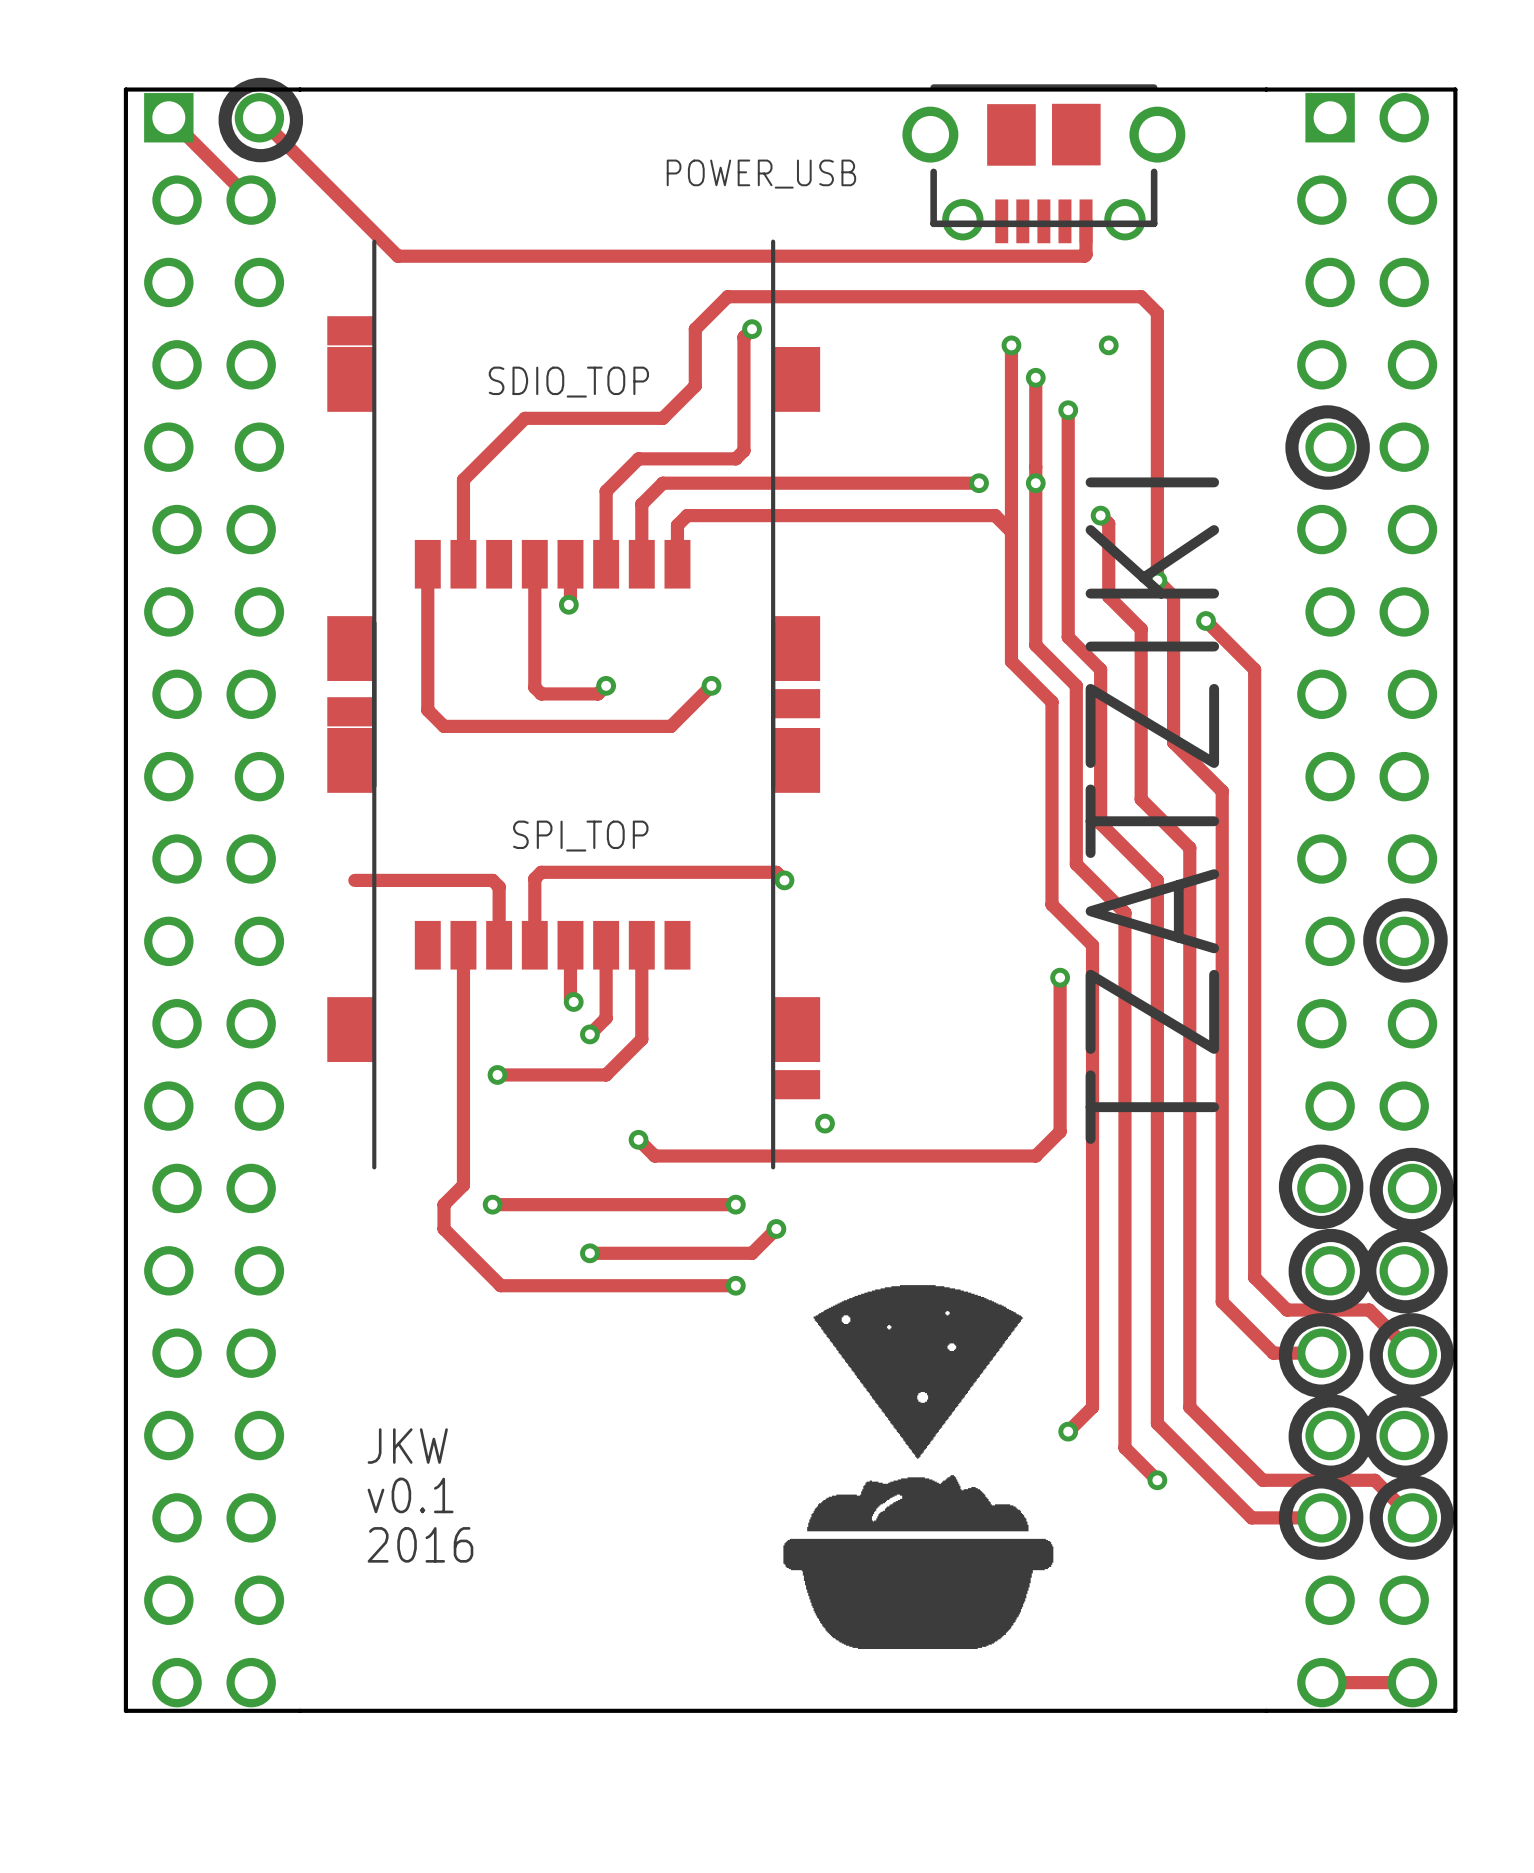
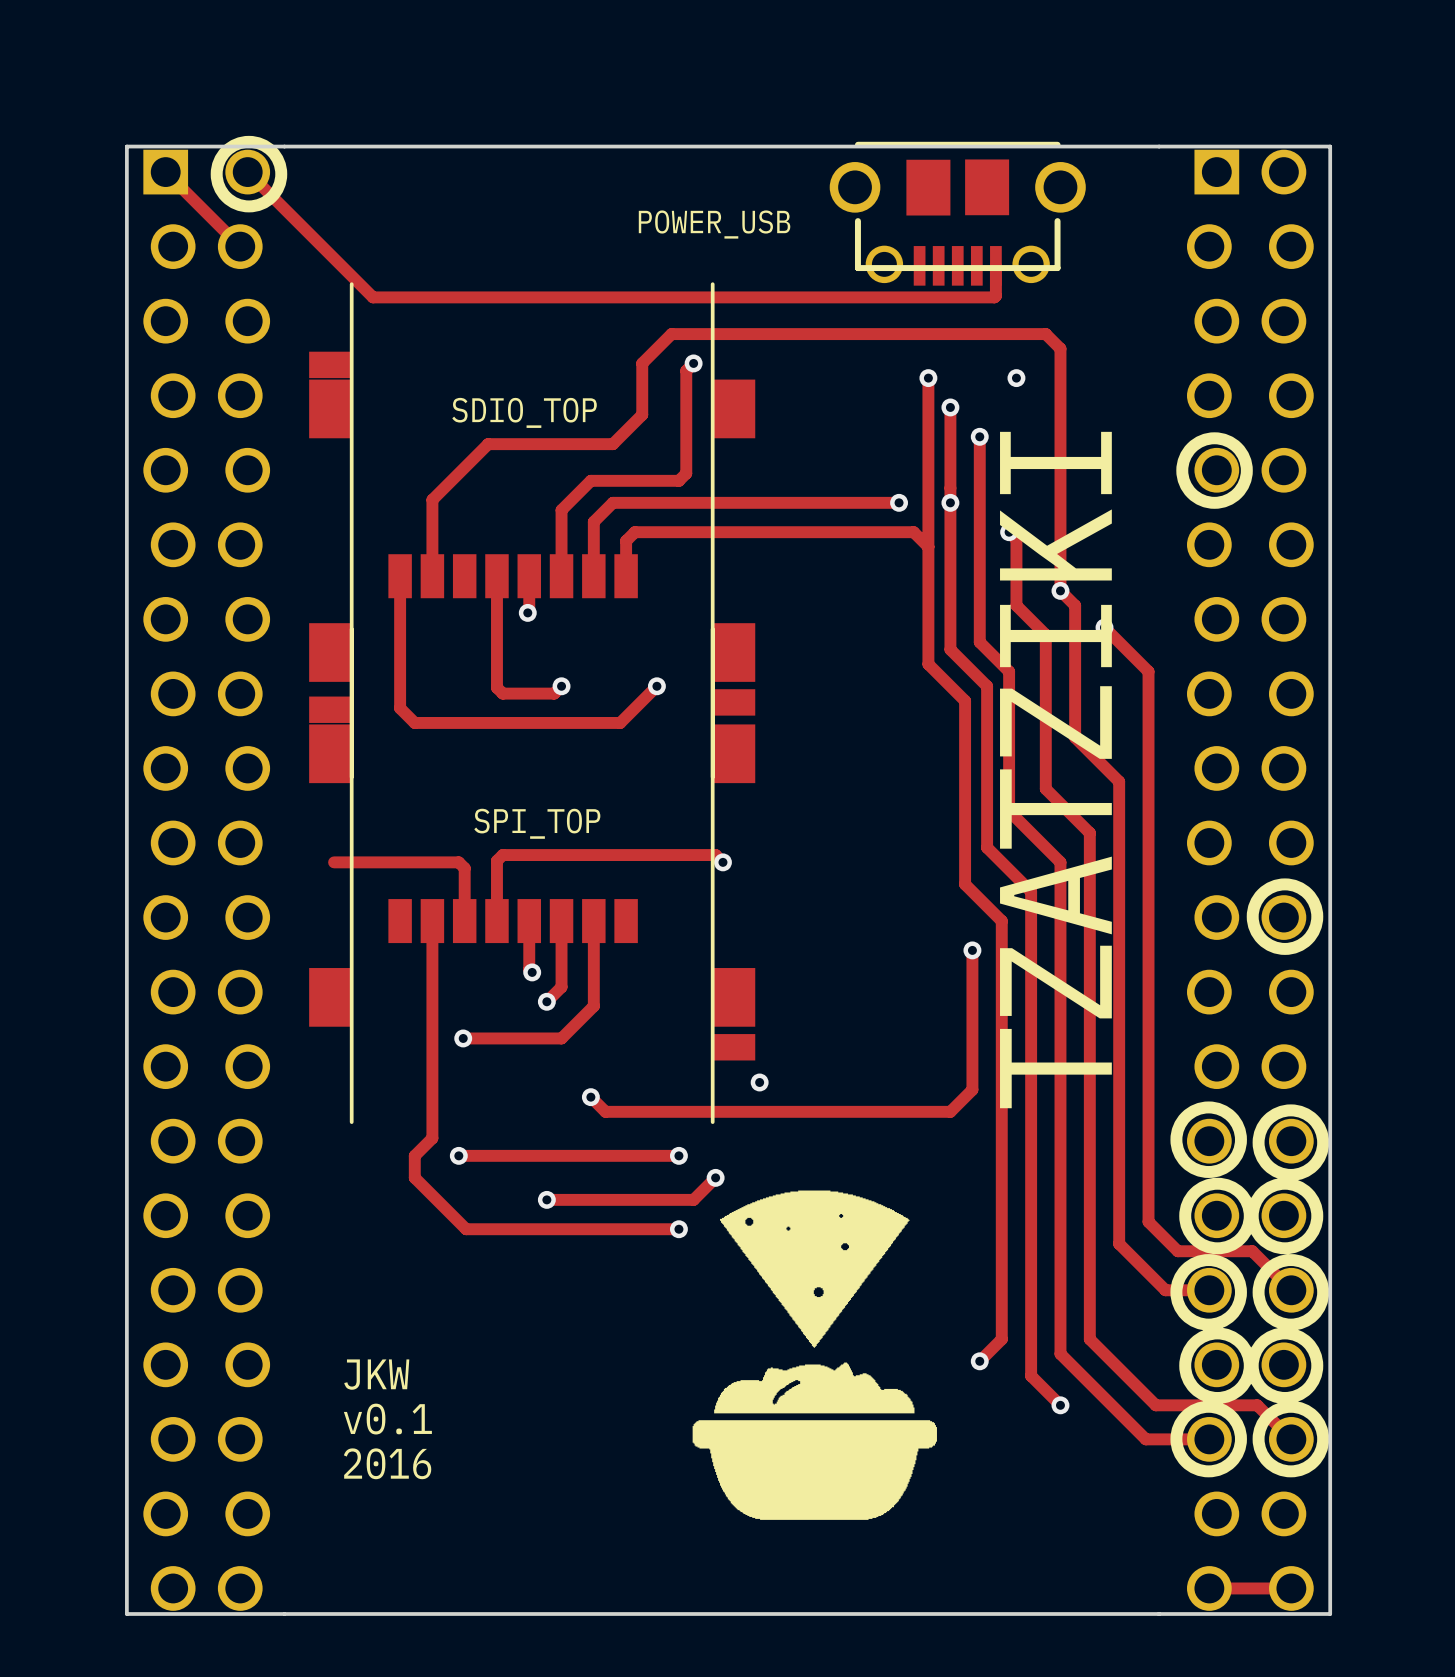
drawing position: (918, 1467) -> (814, 1355)

